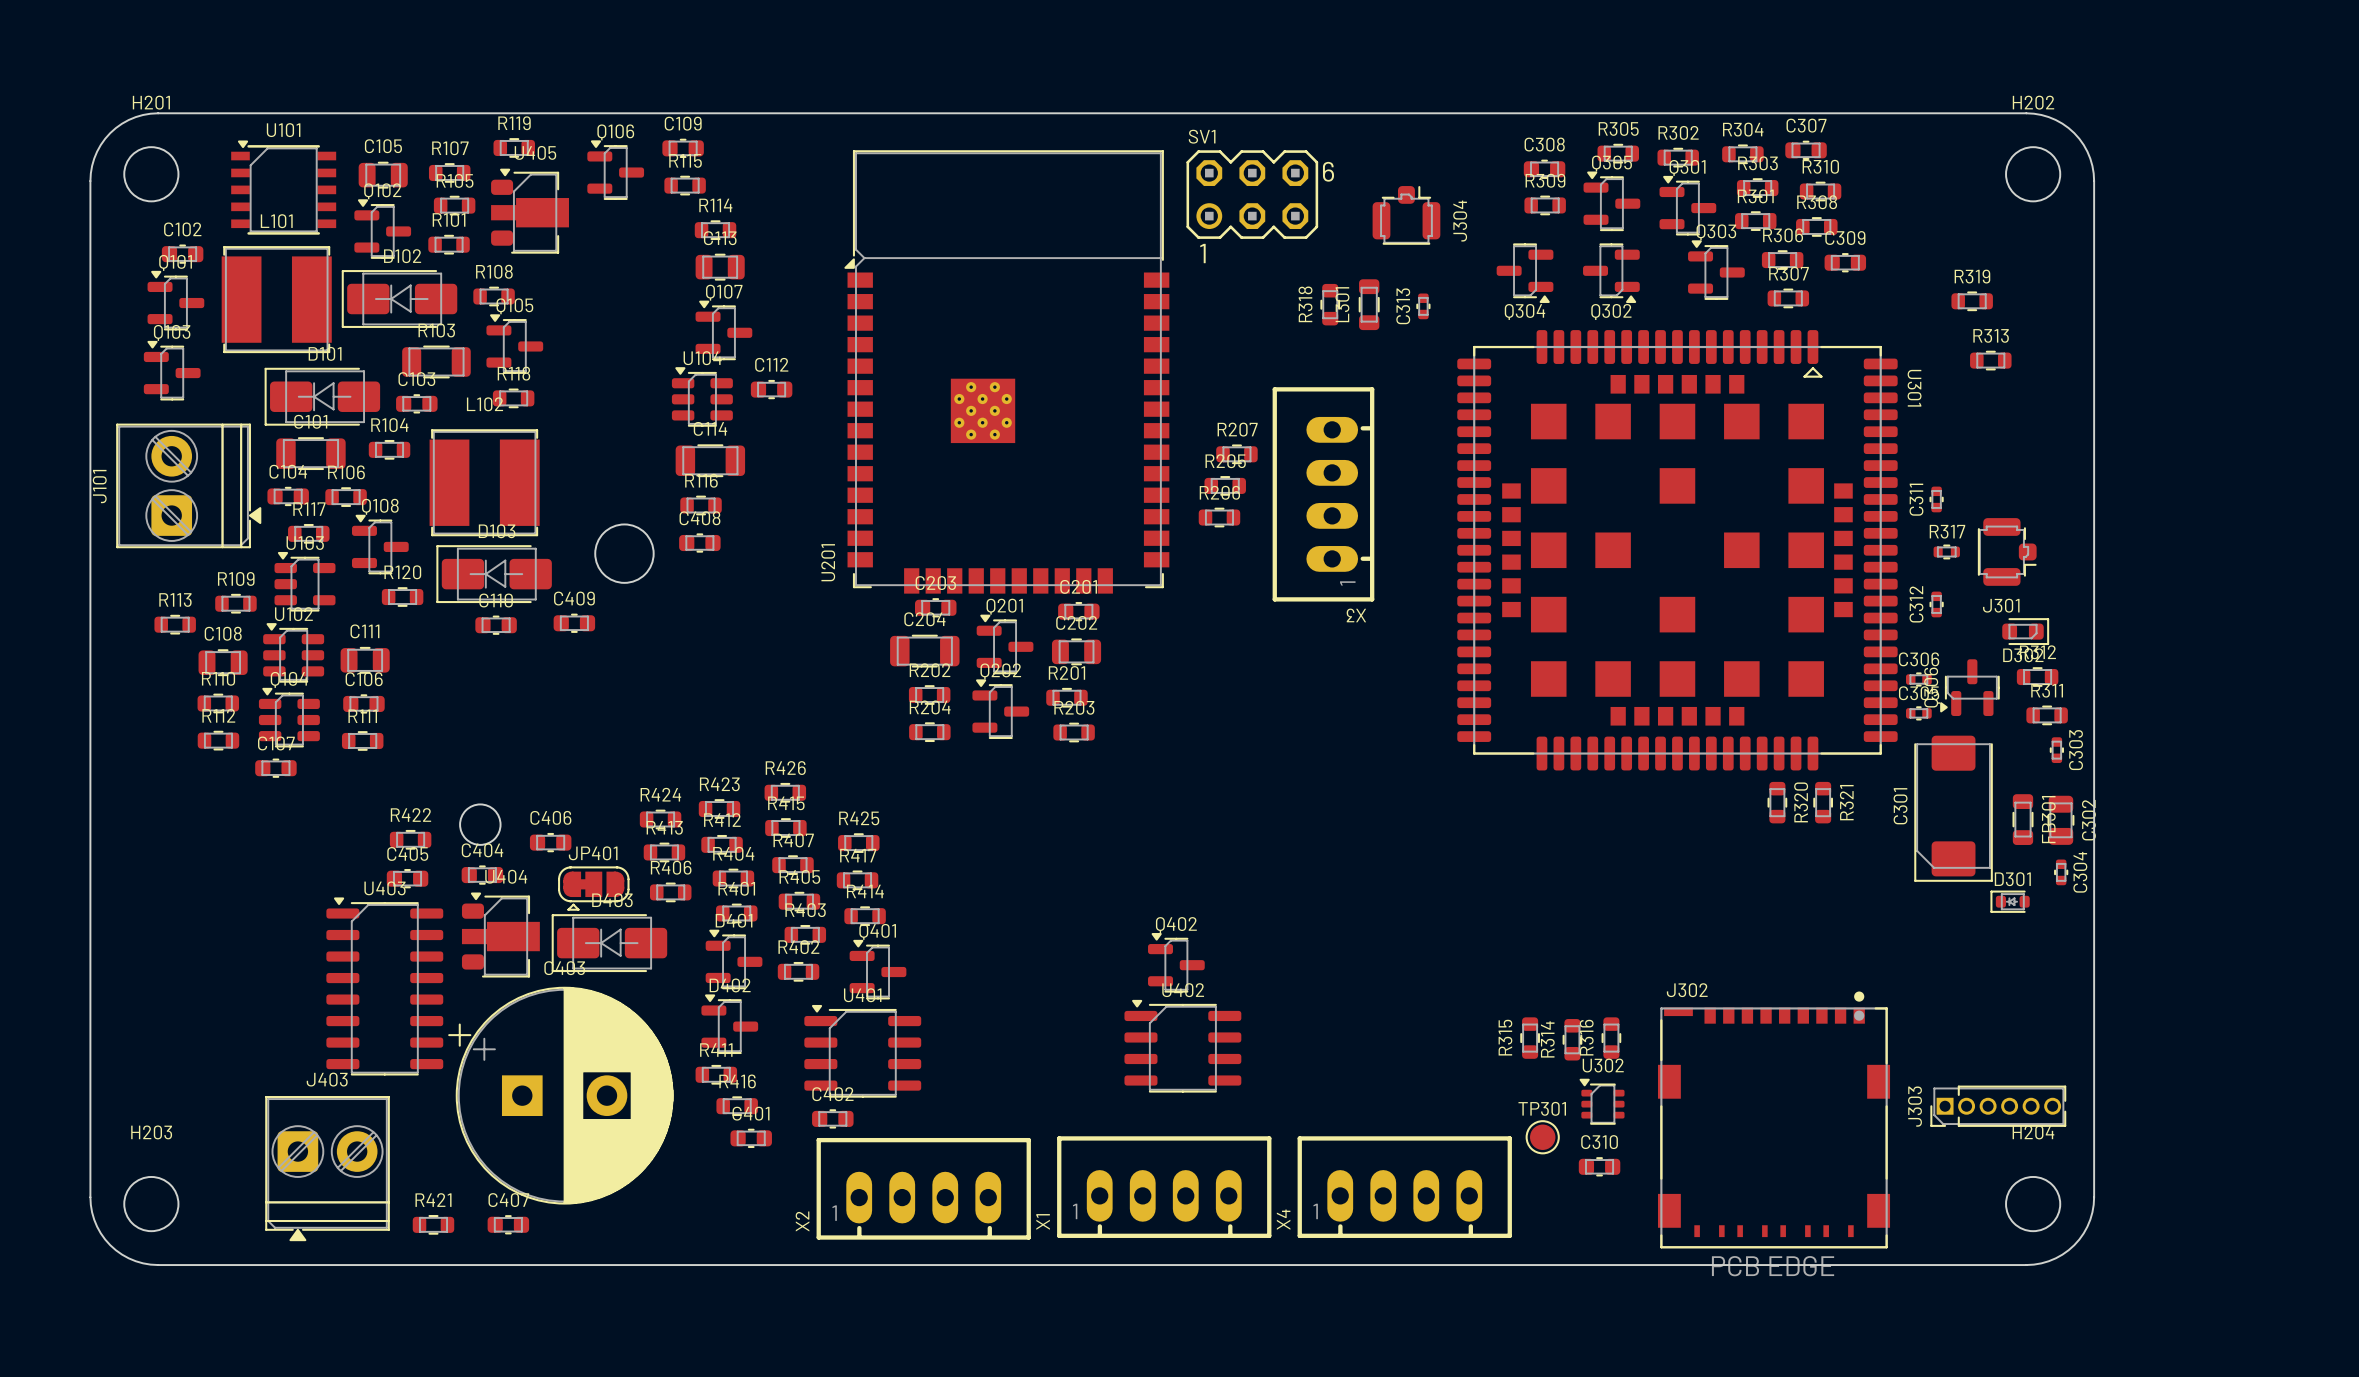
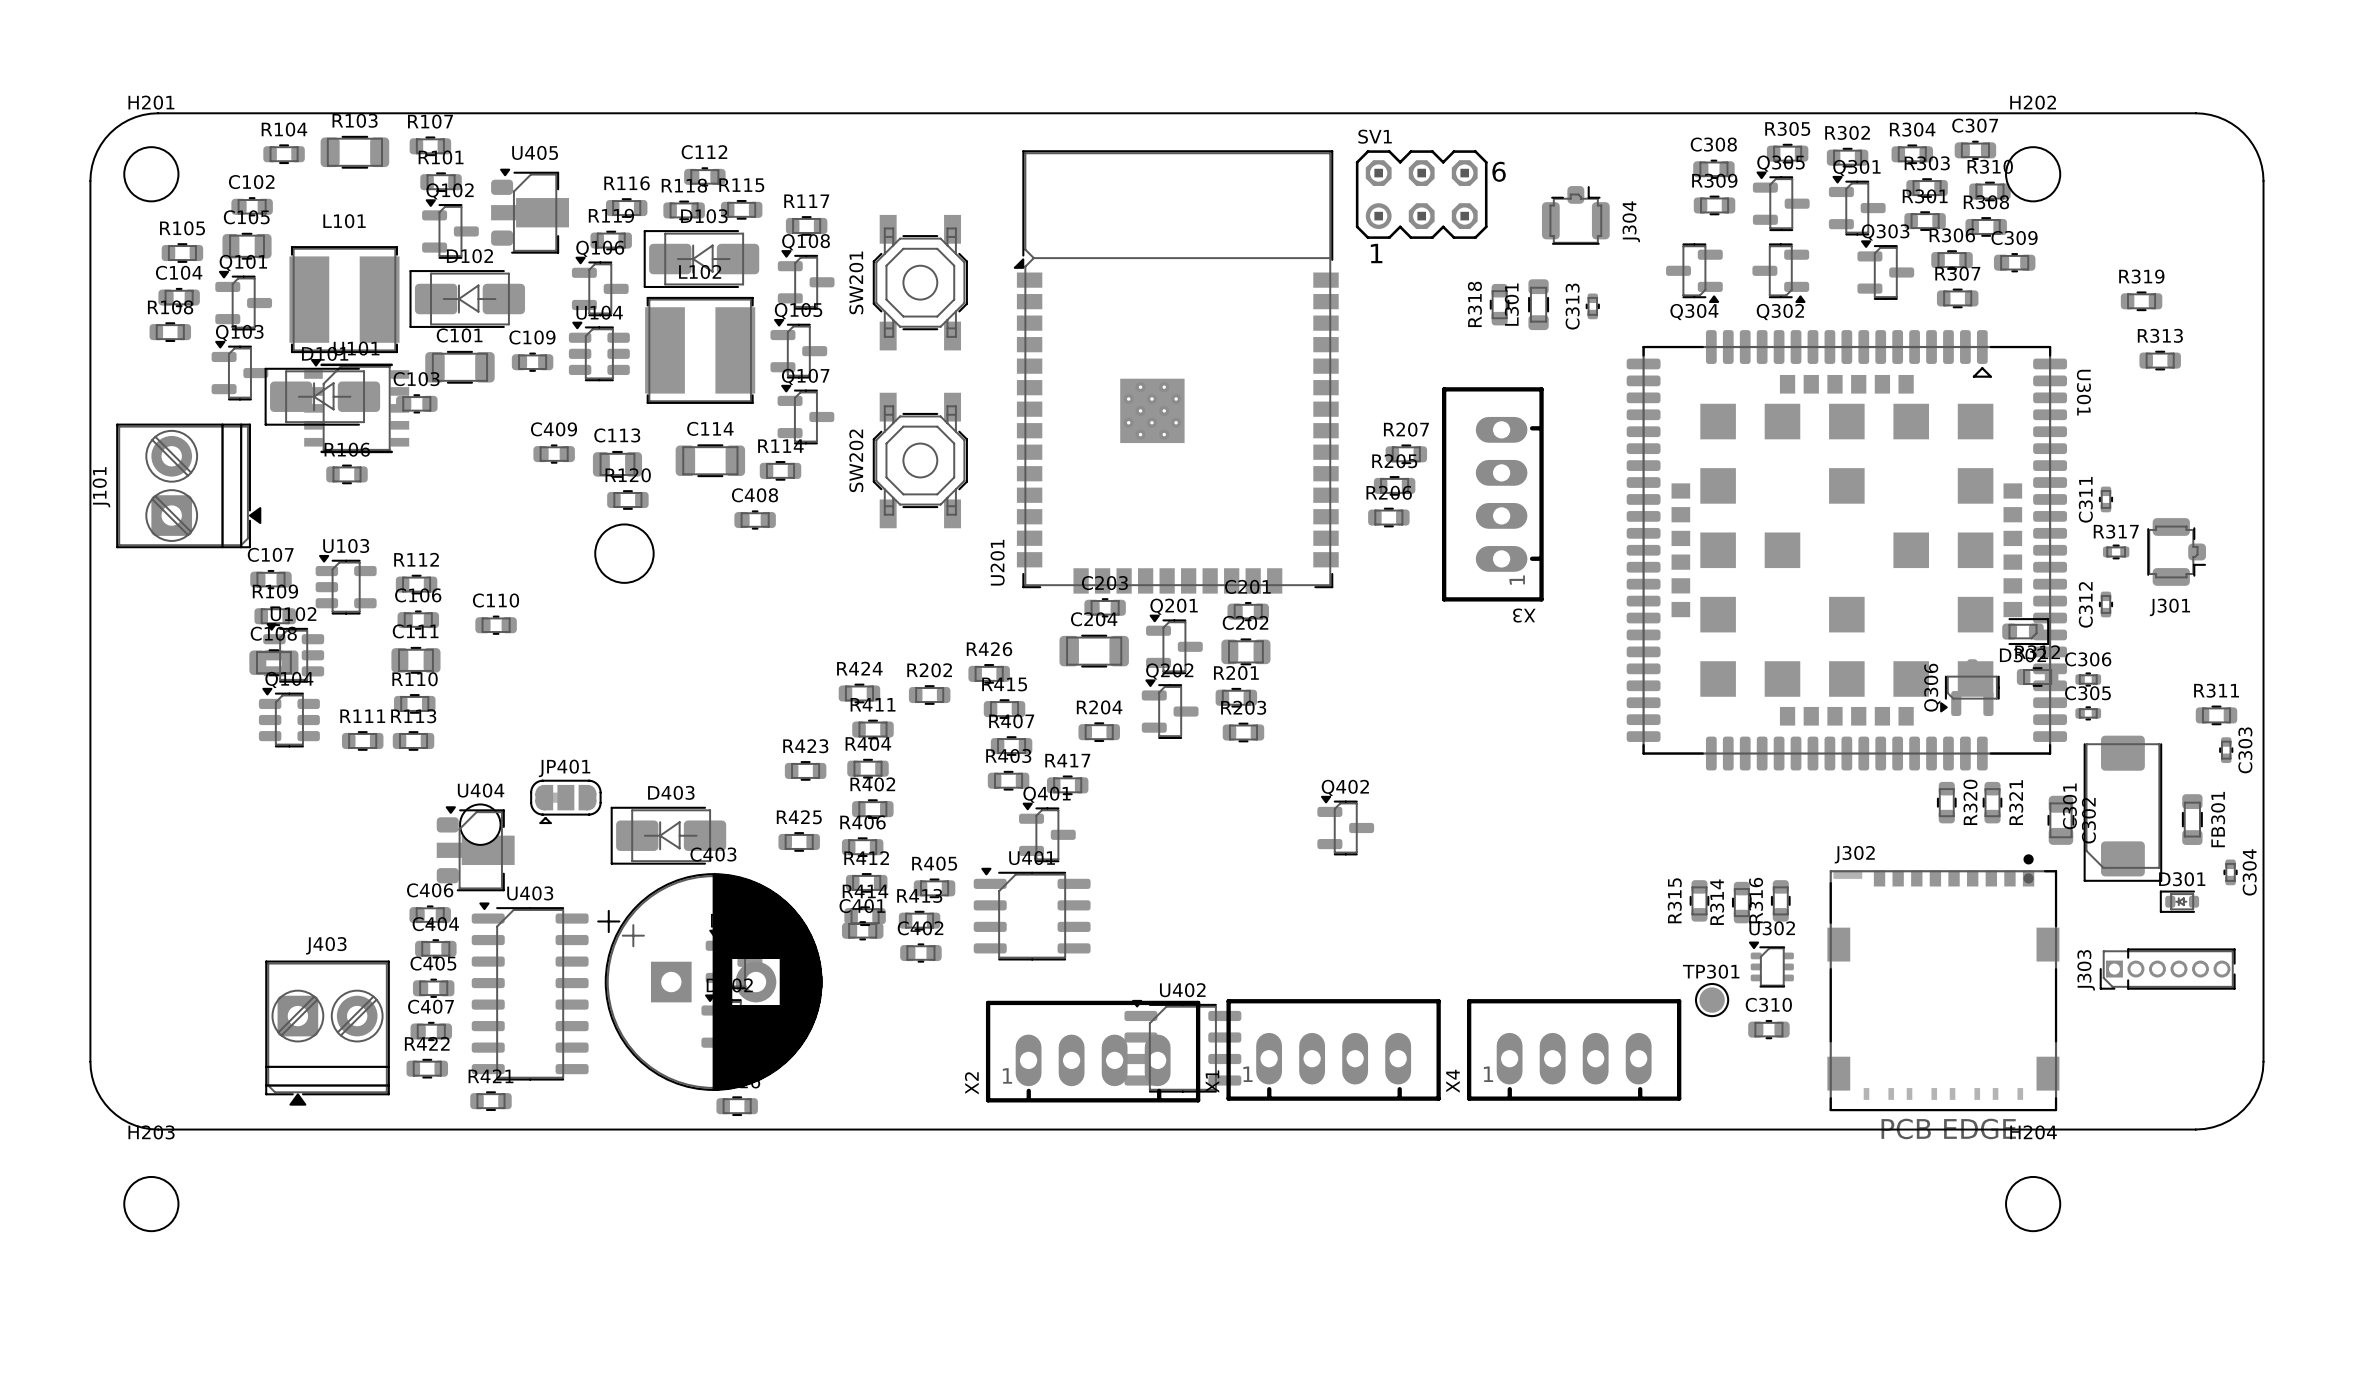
board edge: (2026, 113) (2048, 117) (2062, 123) (2074, 133) (2087, 151) (2092, 165) (2094, 181) (2094, 1197) (2090, 1219) (2083, 1233) (2068, 1250) (2055, 1258) (2041, 1263) (2026, 1265) (150, 1264) (128, 1258) (115, 1250) (105, 1239) (94, 1219) (90, 1197) (90, 1061) -> (2026, 113) (2195, 113) (2210, 114) (2231, 123) (2243, 133) (2256, 151) (2261, 165) (2263, 181) (2263, 1061) (2261, 1079) (2254, 1095) (2243, 1109) (2221, 1124) (2195, 1129) (158, 1129) (143, 1127) (128, 1122) (110, 1109) (97, 1091) (92, 1076) (90, 1061)
R119 position: (514, 147) -> (611, 240)
C109 position: (683, 148) -> (532, 362)
C307 position: (1806, 150) -> (1975, 150)
R305 position: (1618, 153) -> (1787, 153)
R304 position: (1742, 154) -> (1912, 154)
R302 position: (1678, 157) -> (1847, 157)
C308 position: (1544, 169) -> (1713, 169)
Q106 position: (615, 170) -> (600, 286)
R107 position: (449, 172) -> (430, 146)
C105 position: (383, 175) -> (247, 246)
R115 position: (685, 185) -> (741, 209)
U101 position: (283, 187) -> (356, 406)
R303 position: (1757, 188) -> (1927, 188)
R310 position: (1820, 191) -> (1989, 191)
SV1 position: (1252, 194) -> (1421, 194)
Q305 position: (1611, 201) -> (1781, 201)
R105 position: (454, 205) -> (182, 253)
R309 position: (1545, 205) -> (1714, 205)
Q301 position: (1687, 205) -> (1857, 205)
J304 position: (1406, 215) -> (1575, 215)
R301 position: (1755, 221) -> (1925, 221)
R308 position: (1816, 226) -> (1986, 226)
Q102 position: (382, 229) -> (450, 229)
R114 position: (715, 230) -> (780, 470)
R101 position: (449, 244) -> (441, 182)
C102 position: (182, 254) -> (252, 206)
R306 position: (1782, 260) -> (1952, 260)
C309 position: (1845, 262) -> (2014, 262)
C113 position: (720, 267) -> (617, 464)
Q303 position: (1716, 270) -> (1885, 270)
Q304 position: (1525, 273) -> (1694, 273)
Q302 position: (1611, 273) -> (1780, 273)
SW201: none -> (920, 282)
R108 position: (494, 296) -> (170, 332)
R307 position: (1788, 298) -> (1957, 298)
L101 position: (276, 299) -> (344, 299)
D102 position: (399, 299) -> (467, 299)
Q101 position: (175, 300) -> (243, 300)
R319 position: (1972, 301) -> (2141, 301)
R318 position: (1330, 304) -> (1499, 304)
L301 position: (1369, 304) -> (1538, 304)
C313 position: (1423, 306) -> (1592, 306)
Q107 position: (723, 330) -> (805, 414)
Q105 position: (514, 344) -> (798, 348)
R313 position: (1990, 360) -> (2160, 360)
R103 position: (436, 361) -> (354, 152)
Q103 position: (172, 370) -> (239, 370)
U201 position: (1006, 371) -> (1176, 371)
C112 position: (771, 389) -> (704, 176)
U104 position: (702, 396) -> (599, 351)
R118 position: (513, 398) -> (684, 210)
R104 position: (389, 449) -> (284, 154)
C101 position: (310, 453) -> (459, 367)
R207 position: (1236, 454) -> (1406, 454)
SW202: none -> (920, 460)
L102 position: (484, 482) -> (700, 350)
R205 position: (1225, 485) -> (1394, 485)
X3 position: (1323, 494) -> (1492, 494)
C104 position: (288, 496) -> (179, 297)
R106 position: (346, 497) -> (346, 474)
C311 position: (1936, 499) -> (2105, 499)
R116 position: (701, 505) -> (626, 208)
R206 position: (1219, 517) -> (1388, 517)
R117 position: (308, 533) -> (806, 225)
C408 position: (699, 543) -> (755, 520)
Q108 position: (380, 544) -> (806, 279)
U301 position: (1677, 550) -> (1846, 550)
R317 position: (1946, 551) -> (2116, 551)
J301 position: (2007, 551) -> (2176, 551)
D103 position: (494, 574) -> (701, 259)
U103 position: (305, 581) -> (346, 584)
R120 position: (402, 597) -> (627, 500)
R109 position: (235, 603) -> (275, 616)
C312 position: (1936, 604) -> (2105, 604)
C203 position: (935, 607) -> (1105, 607)
C201 position: (1078, 611) -> (1248, 611)
C409 position: (574, 623) -> (554, 454)
R113 position: (175, 624) -> (413, 740)
Q201 position: (1005, 644) -> (1174, 644)
C204 position: (924, 651) -> (1094, 651)
C202 position: (1076, 651) -> (1245, 651)
C111 position: (365, 660) -> (415, 660)
C108 position: (223, 662) -> (273, 662)
C306 position: (1918, 679) -> (2088, 679)
R201 position: (1066, 697) -> (1236, 697)
R110 position: (218, 703) -> (414, 703)
C106 position: (363, 703) -> (418, 620)
Q202 position: (1000, 709) -> (1170, 709)
C305 position: (1918, 713) -> (2088, 713)
R311 position: (2047, 715) -> (2216, 715)
R204 position: (929, 732) -> (1099, 732)
R203 position: (1074, 732) -> (1243, 732)
R112 position: (218, 740) -> (416, 584)
C303 position: (2056, 750) -> (2226, 750)
C107 position: (275, 768) -> (270, 579)
R426 position: (785, 792) -> (989, 673)
R320 position: (1777, 802) -> (1946, 802)
R321 position: (1823, 802) -> (1992, 802)
C301 position: (1953, 808) -> (2122, 808)
R423 position: (719, 809) -> (805, 770)
R424 position: (660, 819) -> (859, 693)
FB301 position: (2022, 819) -> (2192, 819)
R415 position: (785, 828) -> (1004, 709)
R422 position: (410, 839) -> (427, 1068)
C406 position: (550, 842) -> (430, 915)
R425 position: (858, 843) -> (799, 841)
R412 position: (722, 844) -> (866, 882)
R413 position: (664, 852) -> (919, 920)
R407 position: (792, 865) -> (1011, 746)
C304 position: (2061, 872) -> (2230, 872)
C404 position: (482, 875) -> (435, 948)
C405 position: (407, 878) -> (433, 988)
R404 position: (733, 878) -> (868, 768)
R417 position: (857, 880) -> (1067, 785)
JP401 position: (593, 888) -> (565, 801)
R406 position: (670, 892) -> (862, 847)
R405 position: (799, 901) -> (934, 888)
D301 position: (2010, 901) -> (2179, 901)
R403 position: (805, 934) -> (1008, 780)
U404 position: (500, 935) -> (475, 848)
D403 position: (609, 943) -> (668, 835)
Q402 position: (1176, 962) -> (1345, 825)
Q401 position: (878, 969) -> (1047, 832)
R402 position: (798, 971) -> (872, 809)
U403 position: (384, 986) -> (530, 991)
R315 position: (1530, 1038) -> (1699, 900)
R316 position: (1611, 1038) -> (1780, 900)
R314 position: (1572, 1039) -> (1741, 902)
U401 position: (862, 1051) -> (1032, 914)
R411 position: (716, 1074) -> (872, 729)
C403 position: (560, 1095) -> (709, 982)
U302 position: (1602, 1101) -> (1771, 964)
J303 position: (1998, 1106) -> (2167, 969)
C402 position: (832, 1118) -> (920, 953)
J302 position: (1774, 1119) -> (1943, 982)
TP301 position: (1542, 1137) -> (1712, 1000)
C401 position: (751, 1138) -> (862, 930)
C310 position: (1599, 1166) -> (1768, 1029)
J403 position: (327, 1168) -> (327, 1033)
X1 position: (1164, 1187) -> (1333, 1049)
X4 position: (1404, 1187) -> (1574, 1049)
X2 position: (923, 1188) -> (1093, 1051)
R421 position: (433, 1224) -> (490, 1101)
C407 position: (508, 1224) -> (431, 1031)

